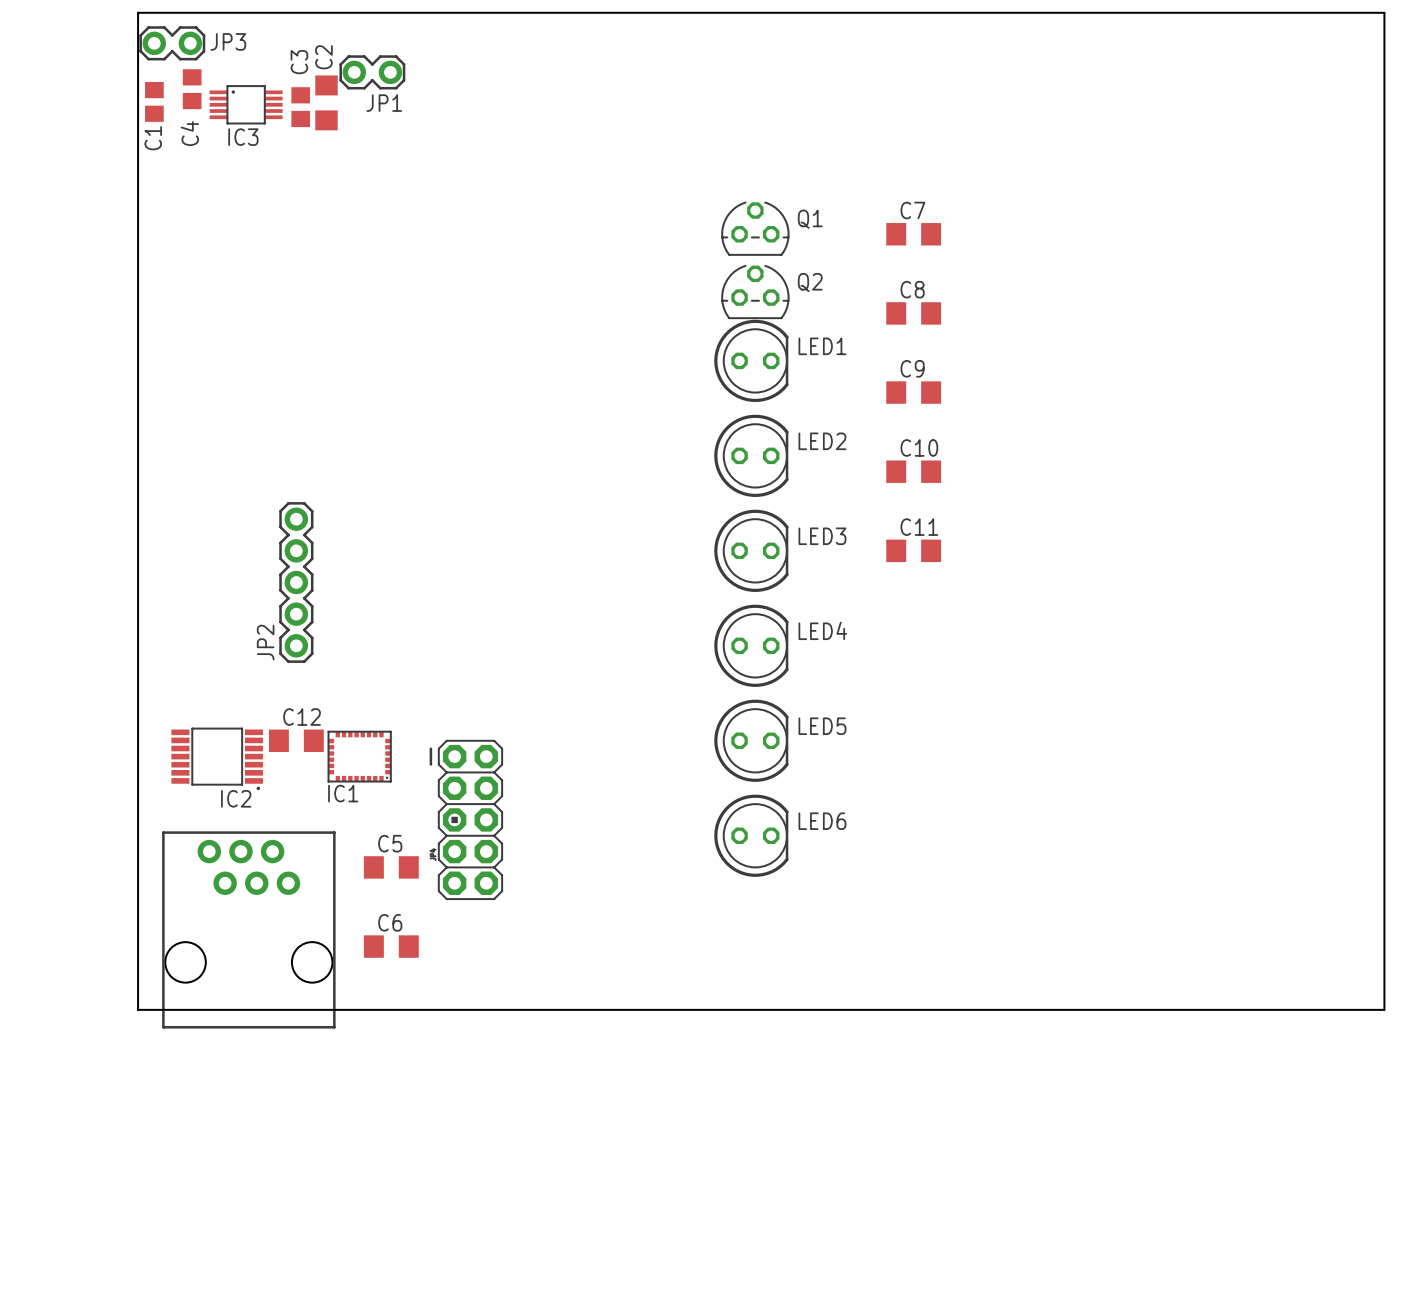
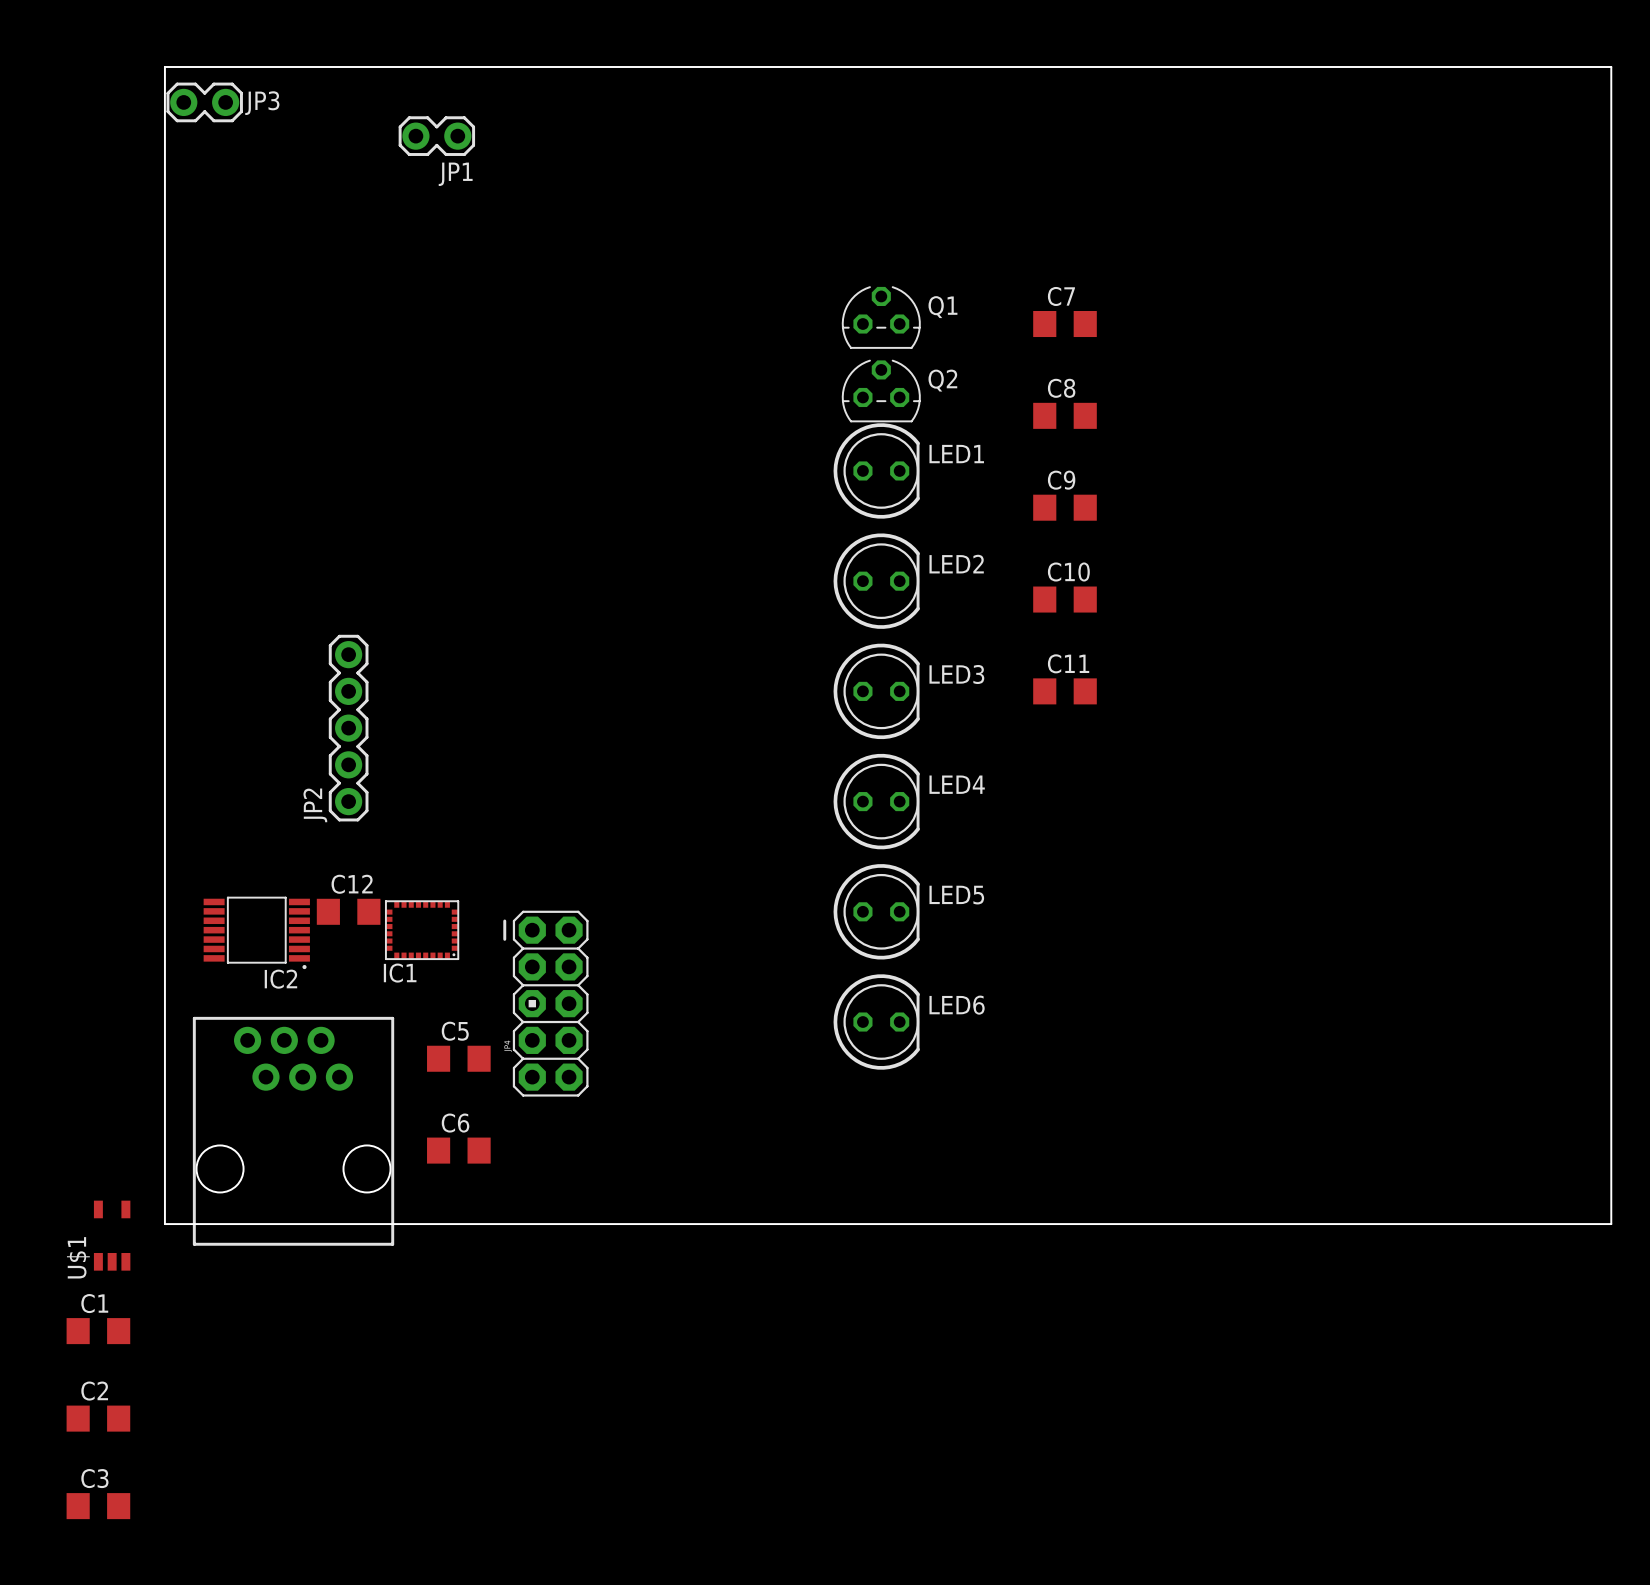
C2 name position: C2 (323, 57) -> C2 (94, 1391)
C3 name position: C3 (299, 62) -> C3 (94, 1478)
C1 footprint: [145, 81, 164, 122] -> [66, 1318, 131, 1345]
C3 footprint: [291, 87, 311, 128] -> [66, 1493, 131, 1520]
C4: (192, 89) -> none
C2 rotation: 0° (326, 102) -> 90° clockwise (98, 1418)
C2 position: (326, 102) -> (98, 1418)
IC3: (246, 104) -> none
C1 name position: C1 (153, 138) -> C1 (94, 1303)
U$1: none -> (112, 1235)

